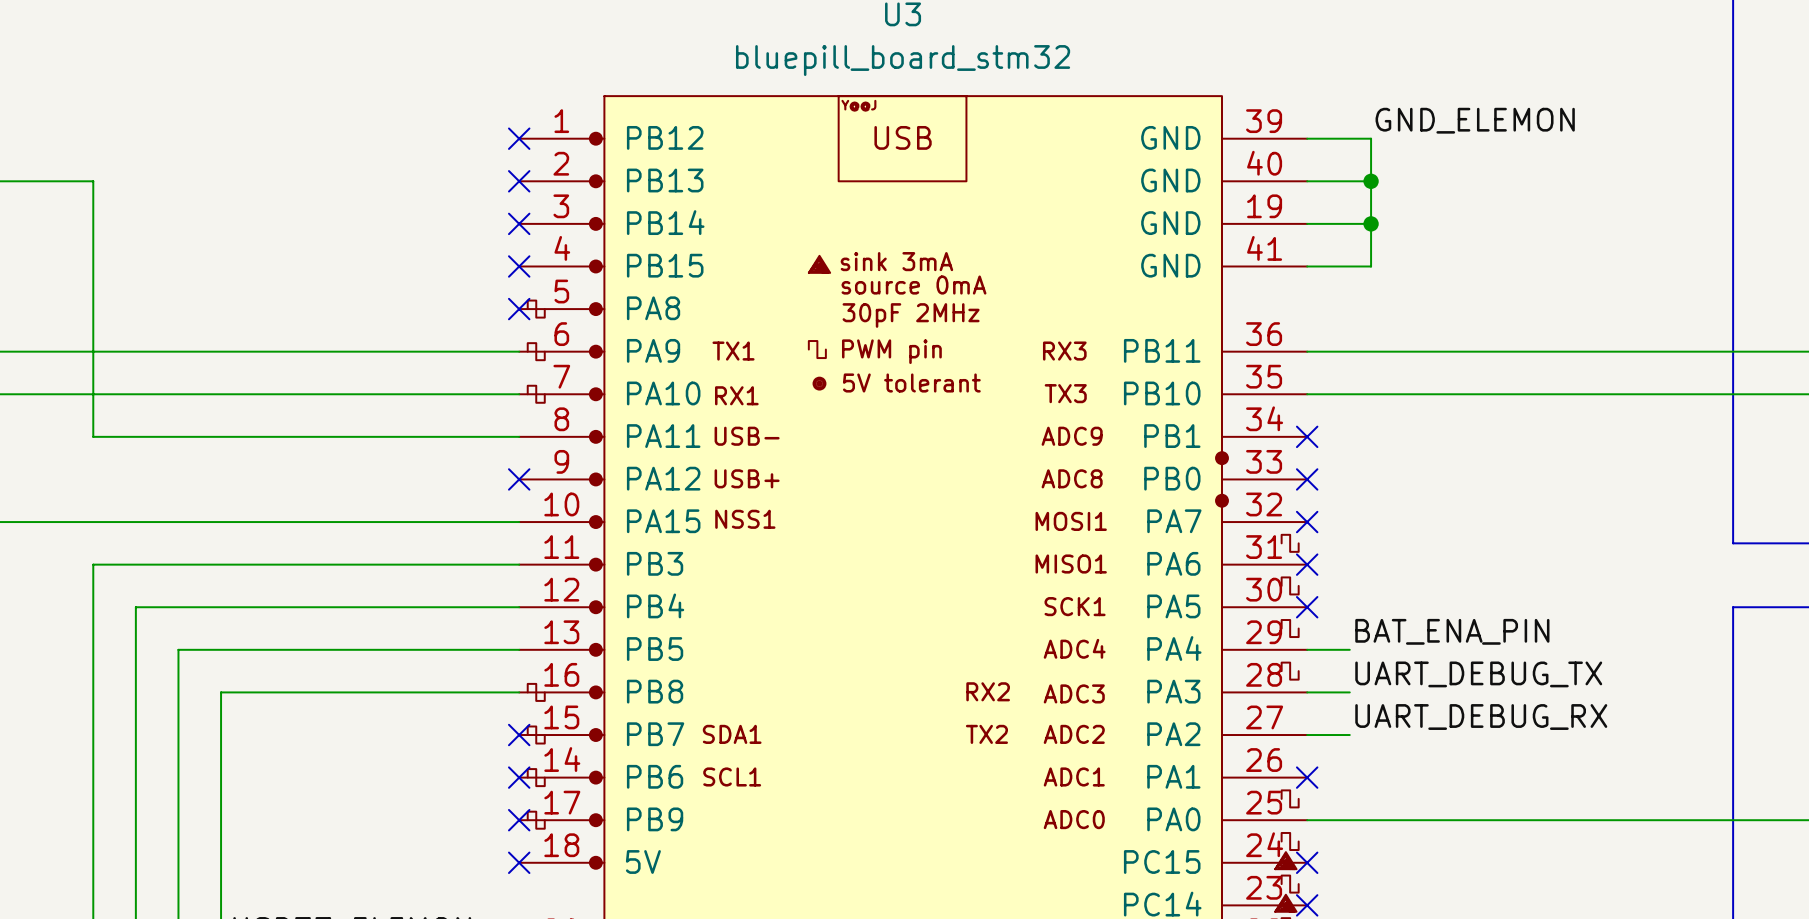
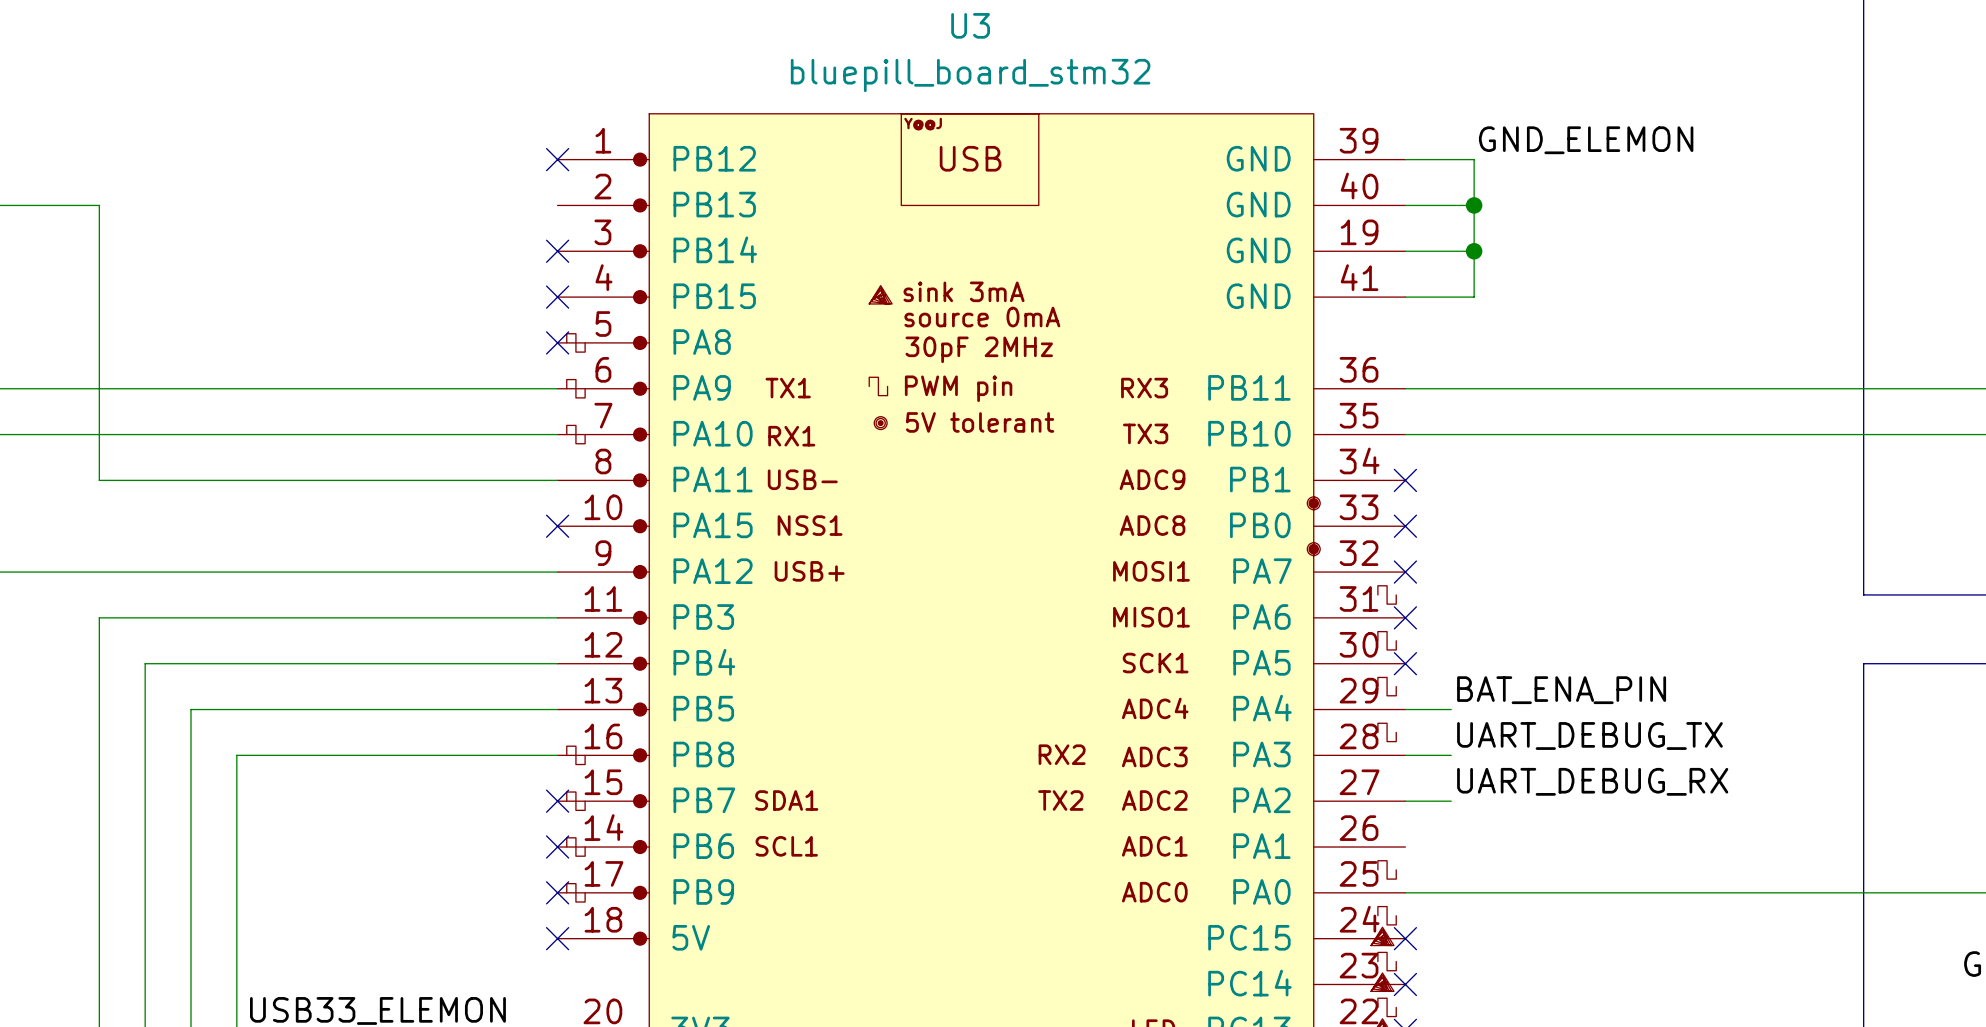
no-connect mark: (519, 181) -> none
U3 pin number: 9 (561, 461) -> 10 (603, 507)
U3 pin name: PA12 (663, 478) -> PA15 (713, 525)
U3 text position: USB+ (747, 478) -> USB+ (809, 571)
U3 pin number: 10 (561, 504) -> 9 (603, 553)
U3 text position: NSS1 (745, 519) -> NSS1 (810, 525)
U3 pin name: PA15 (663, 521) -> PA12 (713, 571)
no-connect mark: (1307, 777) -> none

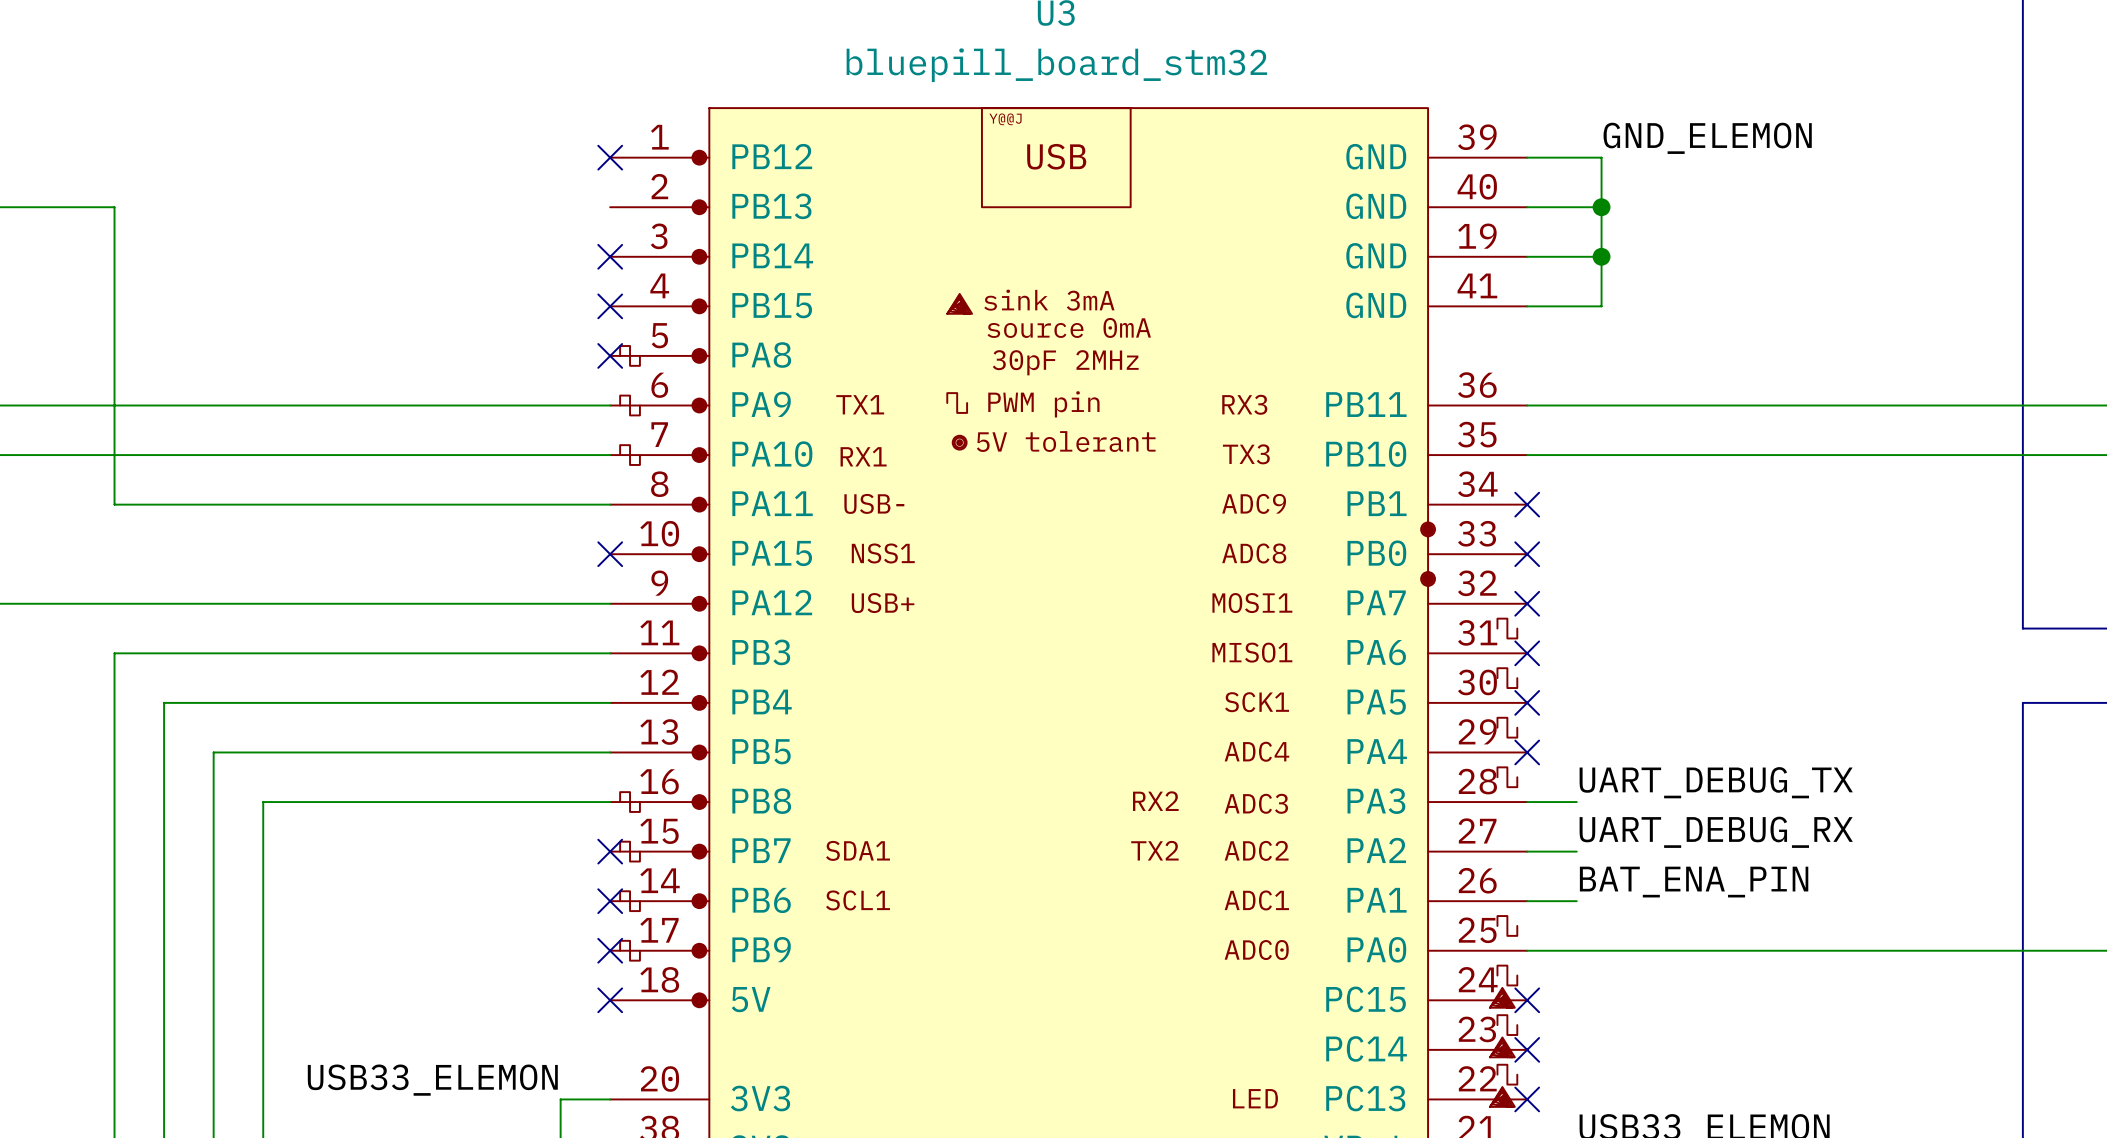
label position: BAT_ENA_PIN (1561, 690) -> BAT_ENA_PIN (1694, 882)
wire: (1405, 709) (1451, 709) -> (1527, 901) (1576, 901)
no-connect mark: none -> (1527, 752)

